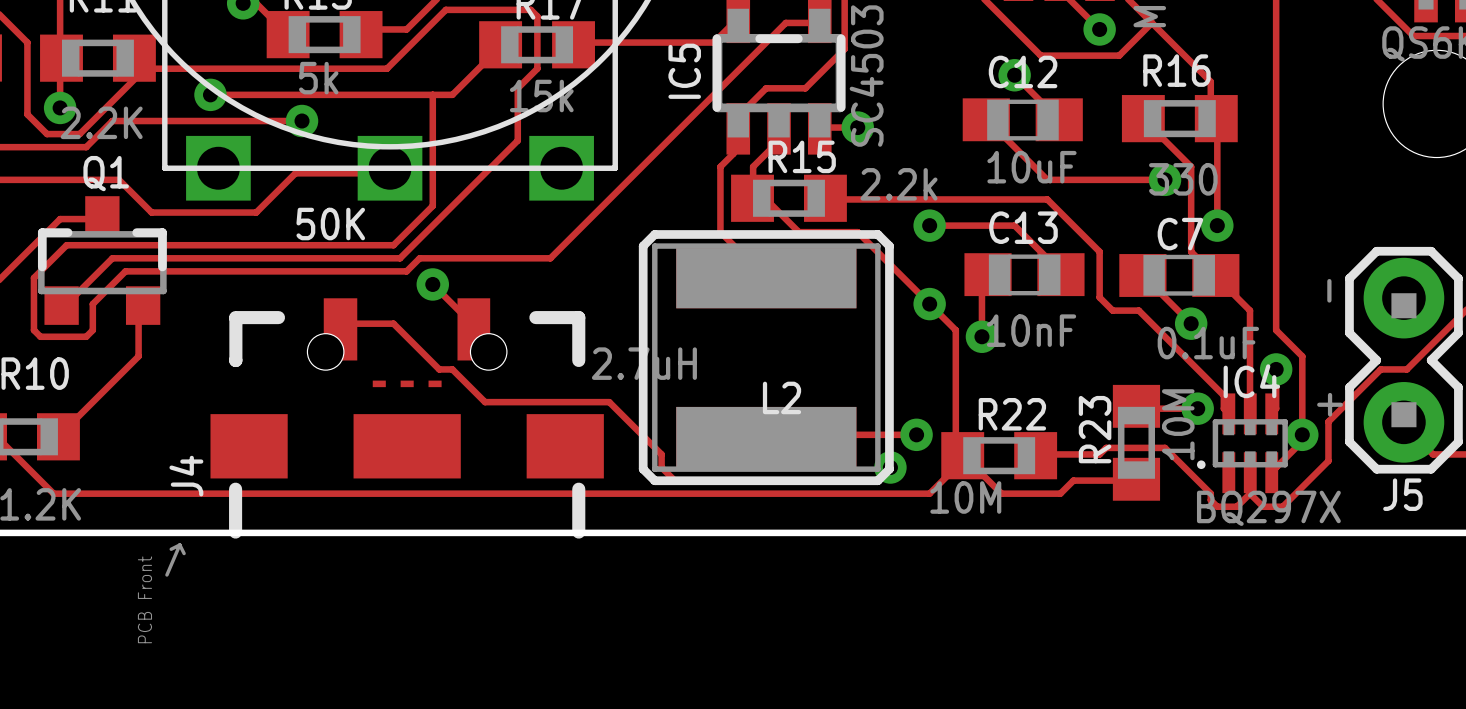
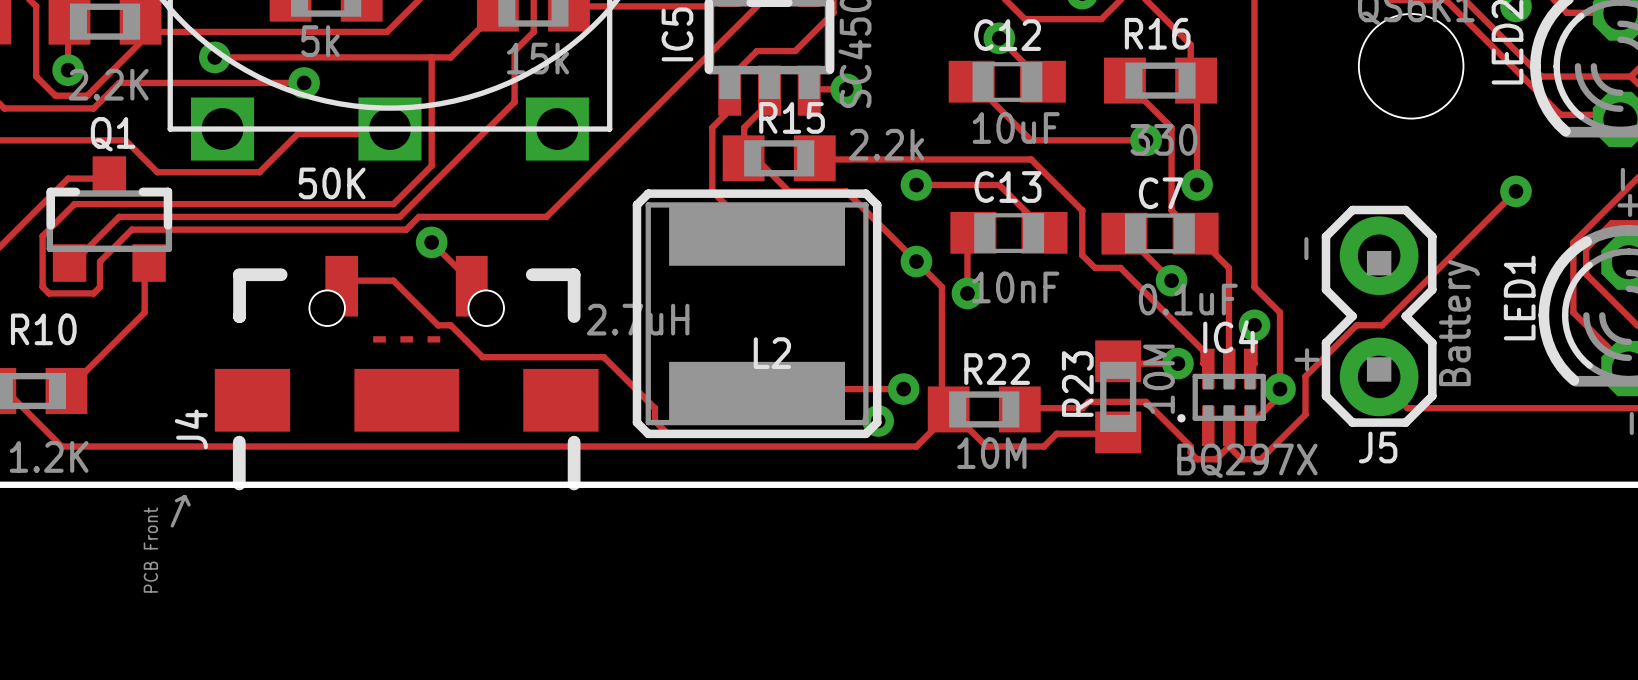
R22 value position: 10M (965, 497) -> 10M (991, 453)

